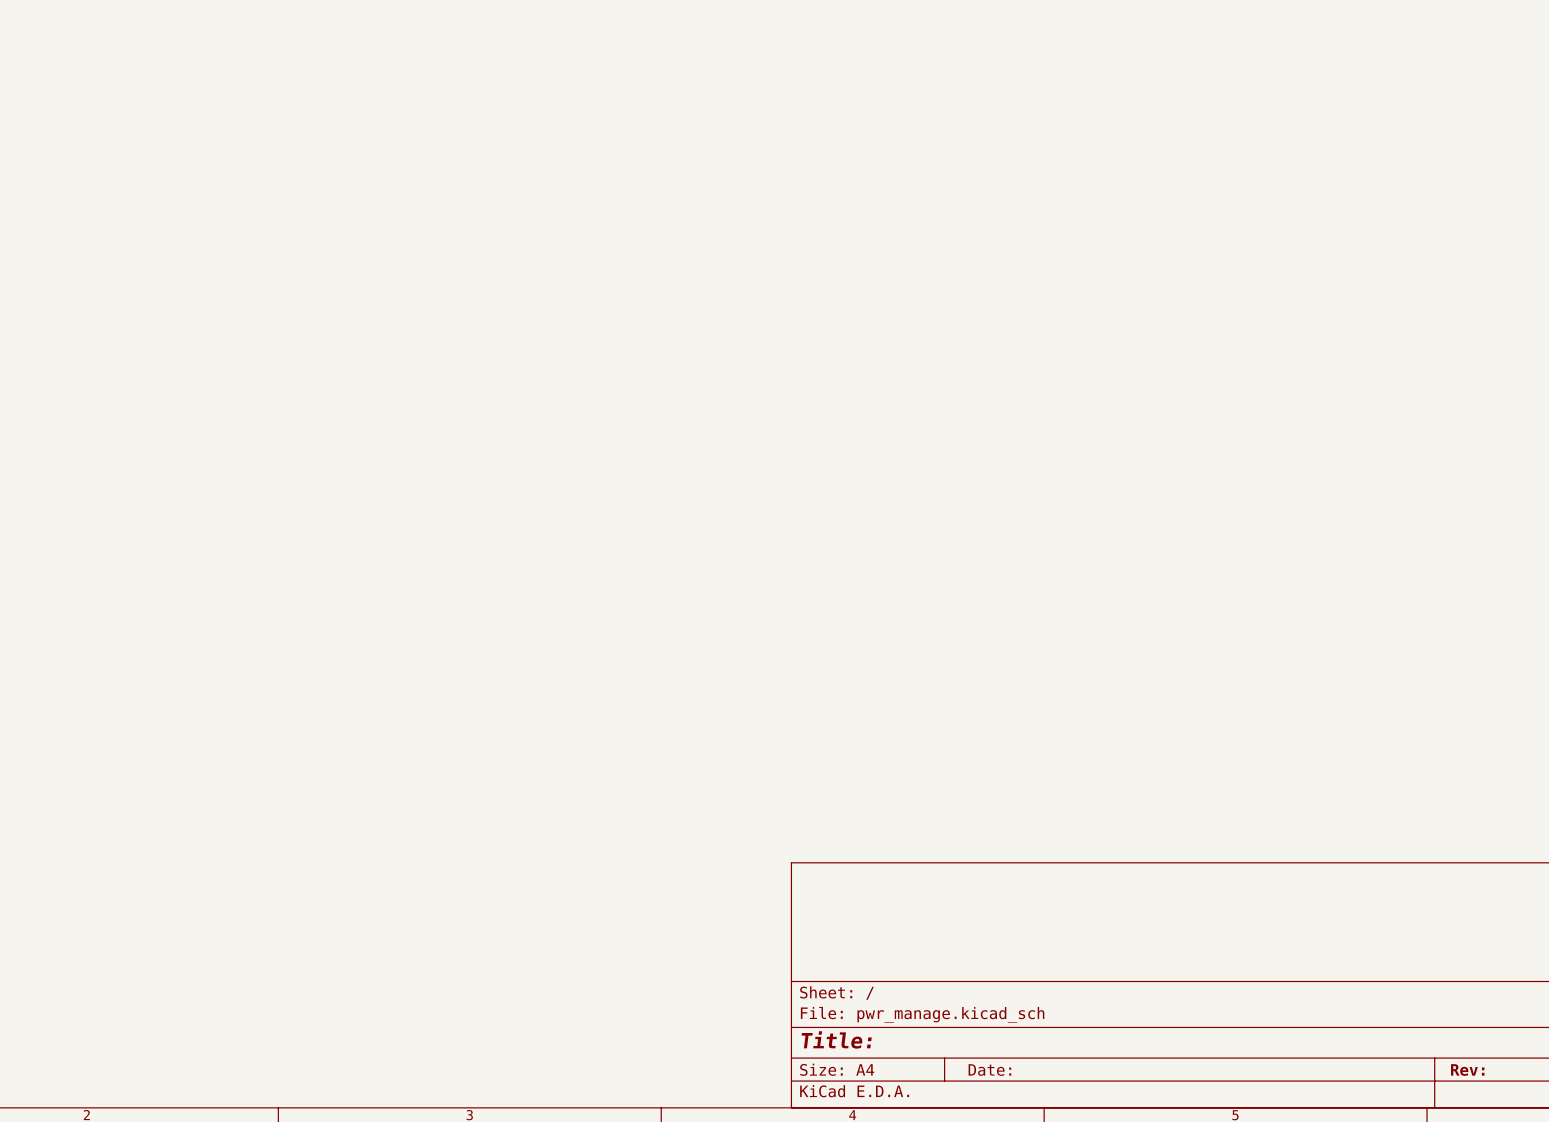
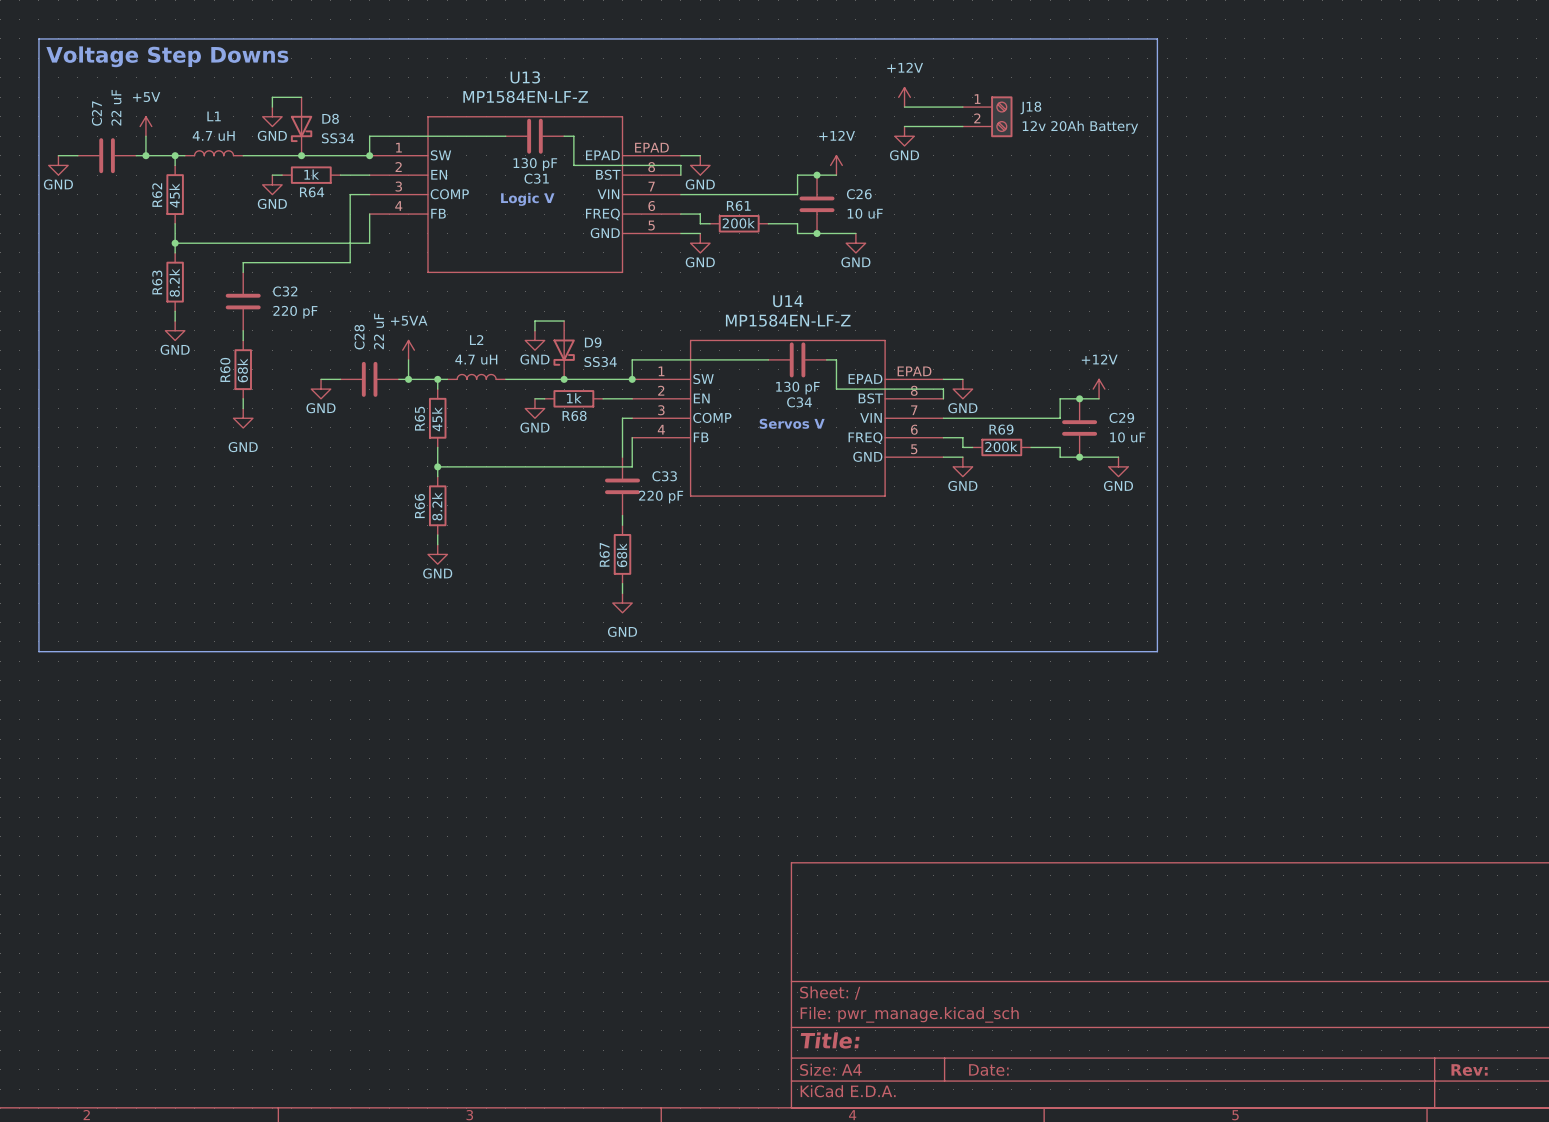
line: none -> (38, 38) (1157, 38) (1157, 651) (38, 651) (38, 38)
text: none -> Voltage Step Downs (167, 56)
wire: none -> (301, 97) (272, 97) (272, 107)
power symbol: none -> +12V (904, 97)
wire: none -> (904, 107) (962, 107)
power symbol: none -> GND (272, 116)
J18: none -> 12v 20Ah Battery (987, 116)
power symbol: none -> +5V (145, 126)
D8: none -> SS34 (301, 126)
wire: none -> (904, 126) (962, 126)
wire: none -> (145, 136) (145, 155)
wire: none -> (505, 136) (369, 136) (369, 155) (243, 155)
C31: none -> 130 pF (534, 136)
wire: none -> (564, 136) (573, 136) (573, 165) (680, 165) (680, 175)
power symbol: none -> GND (904, 136)
L1: none -> 4.7 uH (214, 153)
wire: none -> (58, 155) (77, 155)
C27: none -> 22 uF (107, 155)
wire: none -> (136, 155) (184, 155)
junction: none -> (145, 155)
wire: none -> (175, 155) (175, 165)
junction: none -> (175, 155)
junction: none -> (301, 155)
junction: none -> (369, 155)
wire: none -> (680, 155) (700, 155)
power symbol: none -> GND (58, 165)
power symbol: none -> GND (700, 165)
power symbol: none -> +12V (836, 165)
wire: none -> (272, 175) (282, 175)
R64: none -> 1k (311, 175)
wire: none -> (340, 175) (369, 175)
junction: none -> (817, 175)
wire: none -> (836, 175) (797, 175) (797, 194) (680, 194)
power symbol: none -> GND (272, 184)
R62: none -> 45k (175, 194)
wire: none -> (369, 194) (350, 194) (350, 262) (243, 262) (243, 272)
U13: none -> MP1584EN-LF-Z (525, 194)
text: none -> Logic V (527, 199)
C26: none -> 10 uF (817, 204)
wire: none -> (369, 214) (369, 243) (175, 243)
wire: none -> (680, 214) (700, 214) (700, 223) (710, 223)
wire: none -> (175, 223) (175, 252)
R61: none -> 200k (739, 223)
wire: none -> (768, 223) (797, 223) (797, 233) (855, 233)
wire: none -> (680, 233) (700, 233)
junction: none -> (817, 233)
junction: none -> (175, 243)
power symbol: none -> GND (700, 243)
power symbol: none -> GND (855, 243)
R63: none -> 8.2k (175, 282)
C32: none -> 220 pF (243, 301)
wire: none -> (175, 311) (175, 321)
wire: none -> (564, 321) (534, 321) (534, 330)
power symbol: none -> GND (175, 330)
wire: none -> (243, 330) (243, 340)
power symbol: none -> GND (534, 340)
power symbol: none -> +5VA (408, 350)
D9: none -> SS34 (564, 350)
wire: none -> (408, 359) (408, 379)
wire: none -> (768, 359) (632, 359) (632, 379) (505, 379)
C34: none -> 130 pF (797, 359)
wire: none -> (826, 359) (836, 359) (836, 389) (943, 389) (943, 398)
R60: none -> 68k (243, 369)
L2: none -> 4.7 uH (476, 376)
wire: none -> (321, 379) (340, 379)
C28: none -> 22 uF (369, 379)
wire: none -> (398, 379) (447, 379)
junction: none -> (408, 379)
wire: none -> (437, 379) (437, 389)
junction: none -> (437, 379)
junction: none -> (564, 379)
junction: none -> (632, 379)
wire: none -> (943, 379) (962, 379)
power symbol: none -> GND (321, 389)
power symbol: none -> GND (962, 389)
power symbol: none -> +12V (1099, 389)
wire: none -> (243, 398) (243, 408)
wire: none -> (534, 398) (544, 398)
R68: none -> 1k (573, 398)
wire: none -> (603, 398) (632, 398)
junction: none -> (1079, 398)
wire: none -> (1099, 398) (1060, 398) (1060, 418) (943, 418)
power symbol: none -> GND (534, 408)
power symbol: none -> GND (243, 418)
R65: none -> 45k (437, 418)
wire: none -> (632, 418) (622, 418) (622, 457)
U14: none -> MP1584EN-LF-Z (787, 418)
text: none -> Servos V (792, 423)
C29: none -> 10 uF (1079, 427)
wire: none -> (632, 437) (632, 466) (437, 466)
wire: none -> (943, 437) (962, 437) (962, 447) (972, 447)
wire: none -> (437, 447) (437, 476)
R69: none -> 200k (1001, 447)
wire: none -> (1030, 447) (1060, 447) (1060, 457) (1118, 457)
wire: none -> (943, 457) (962, 457)
junction: none -> (1079, 457)
junction: none -> (437, 466)
power symbol: none -> GND (962, 466)
power symbol: none -> GND (1118, 466)
C33: none -> 220 pF (622, 486)
R66: none -> 8.2k (437, 505)
wire: none -> (622, 515) (622, 525)
wire: none -> (437, 534) (437, 544)
power symbol: none -> GND (437, 554)
R67: none -> 68k (622, 554)
wire: none -> (622, 583) (622, 593)
power symbol: none -> GND (622, 603)

